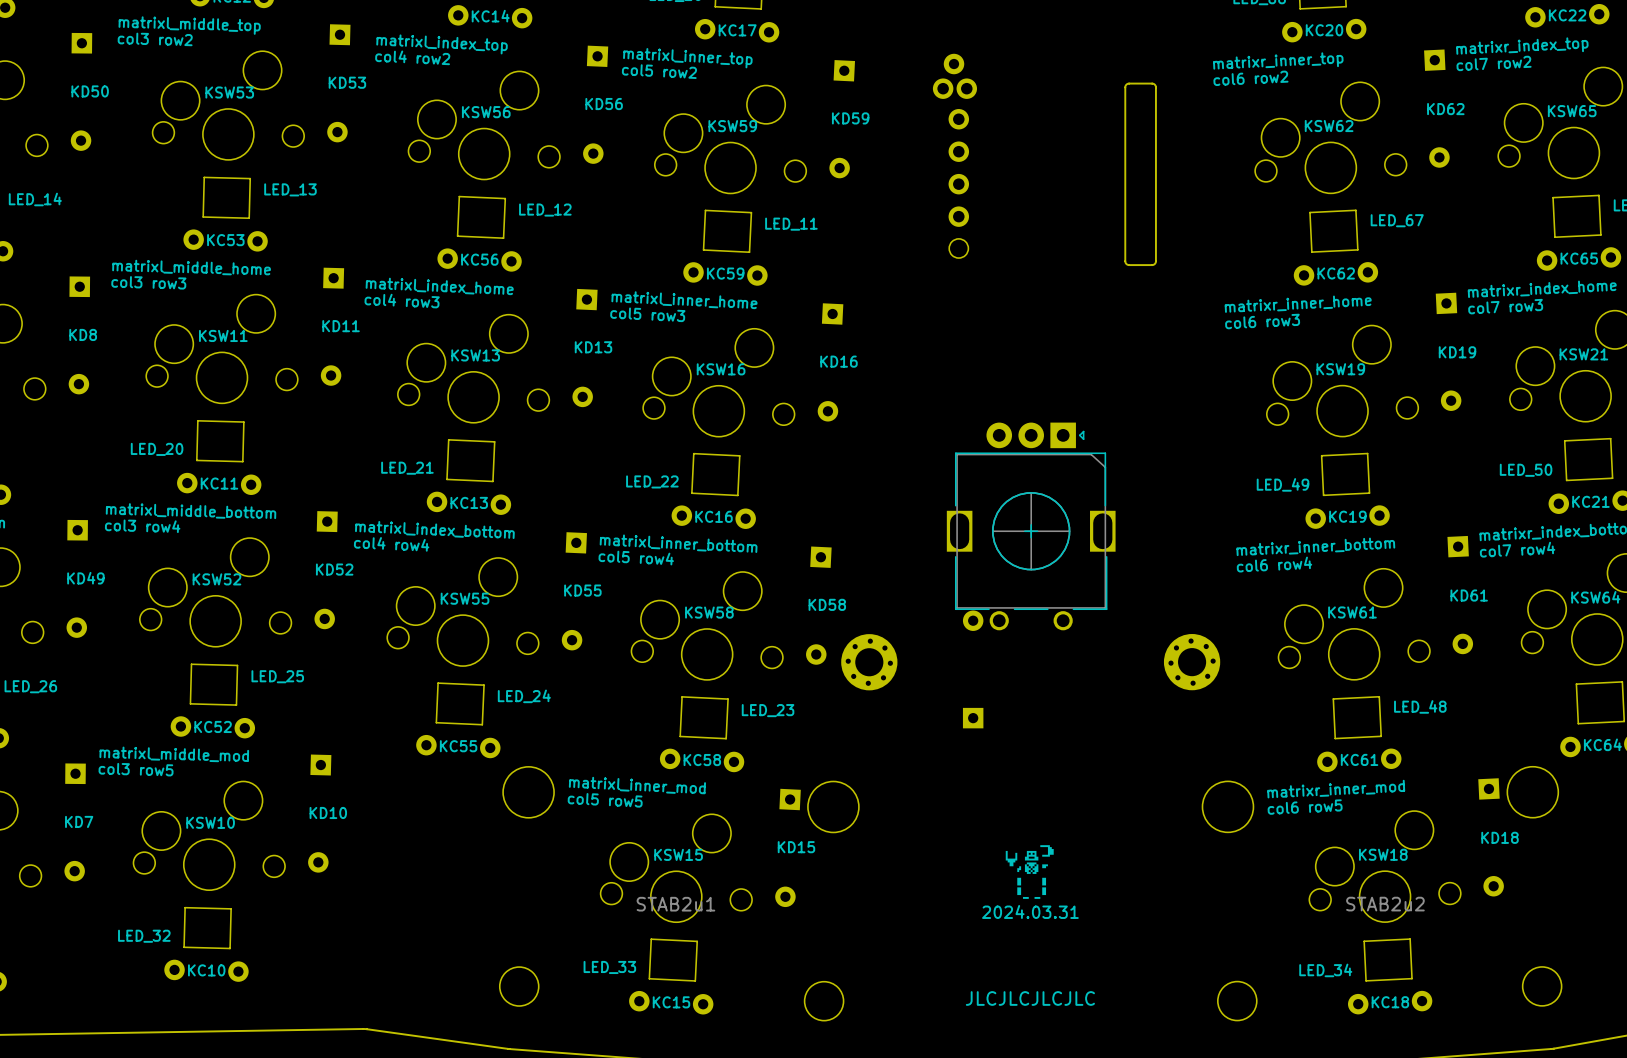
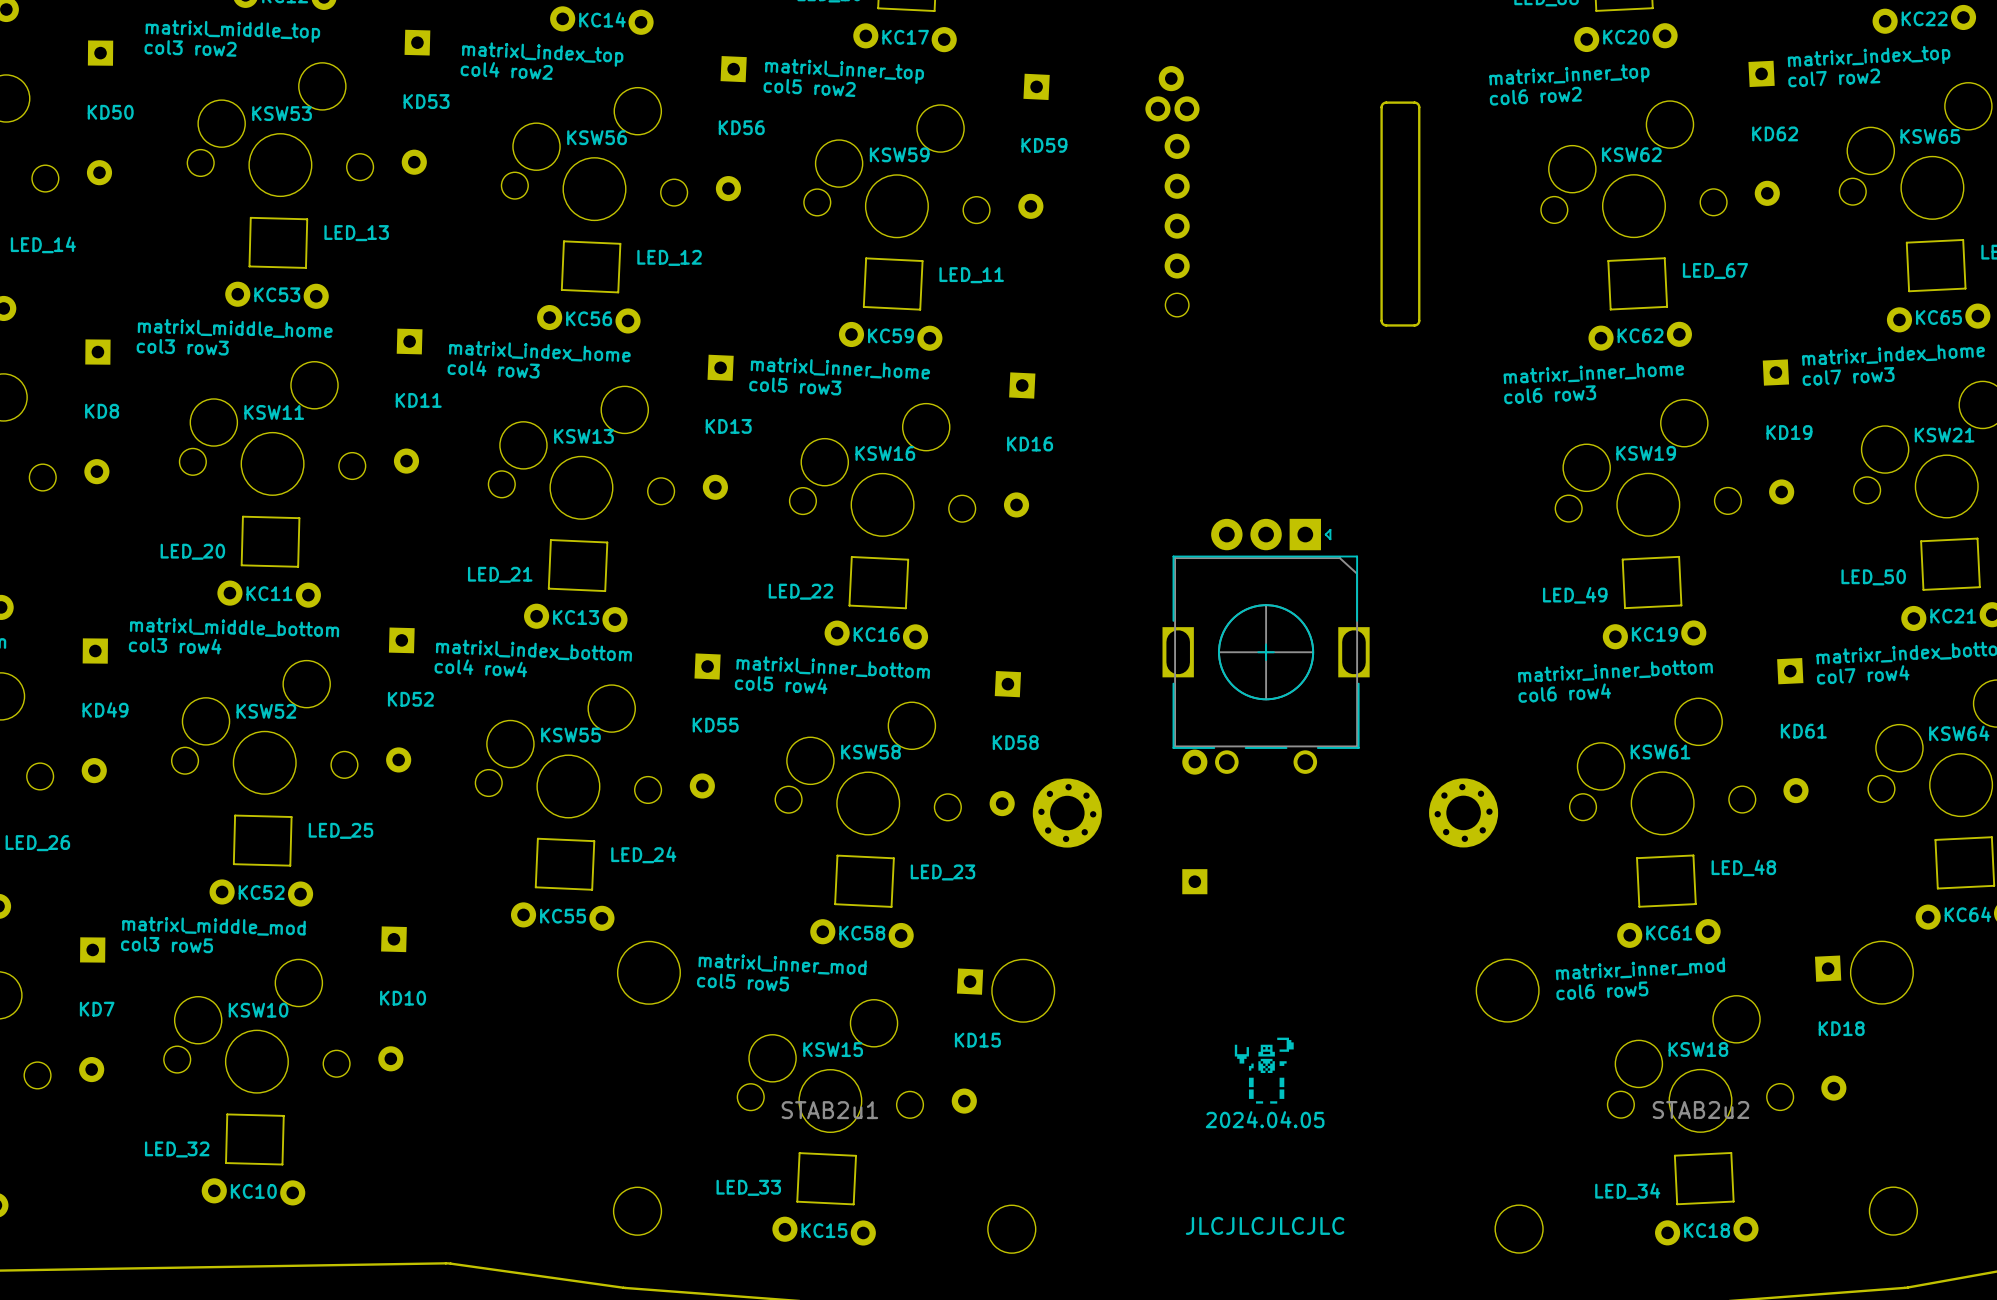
text: 2024.03.31 (1030, 911) -> 2024.04.05 (1265, 1119)

